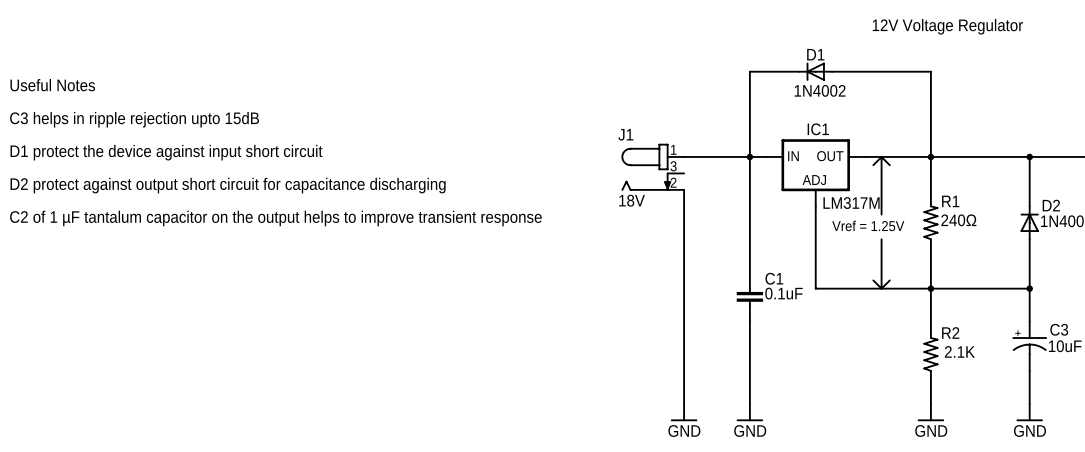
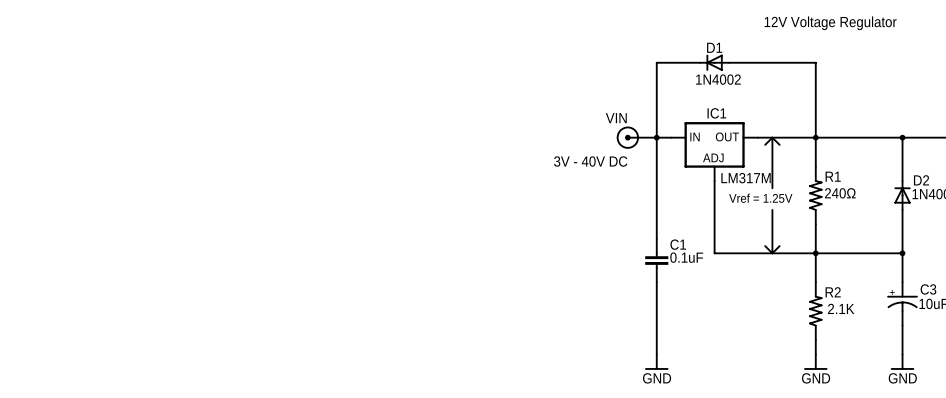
text: Useful Notes (52, 85) -> none
text: C3 helps in ripple rejection upto 15dB (134, 119) -> none
label: none -> VIN (616, 118)
drawing: none -> [617, 127, 639, 149]
text: D1 protect the device against input short circuit (166, 152) -> none
wire: (684, 156) (716, 156) -> none
junction: none -> (627, 137)
J1: 18V (652, 167) -> none
text: none -> 3V - 40V DC (590, 161)
text: D2 protect against output short circuit for capacitance discharging (228, 185) -> none
wire: (684, 189) (684, 403) -> none
text: C2 of 1 µF tantalum capacitor on the output helps to improve transient response (275, 218) -> none
power symbol: GND (684, 412) -> none

